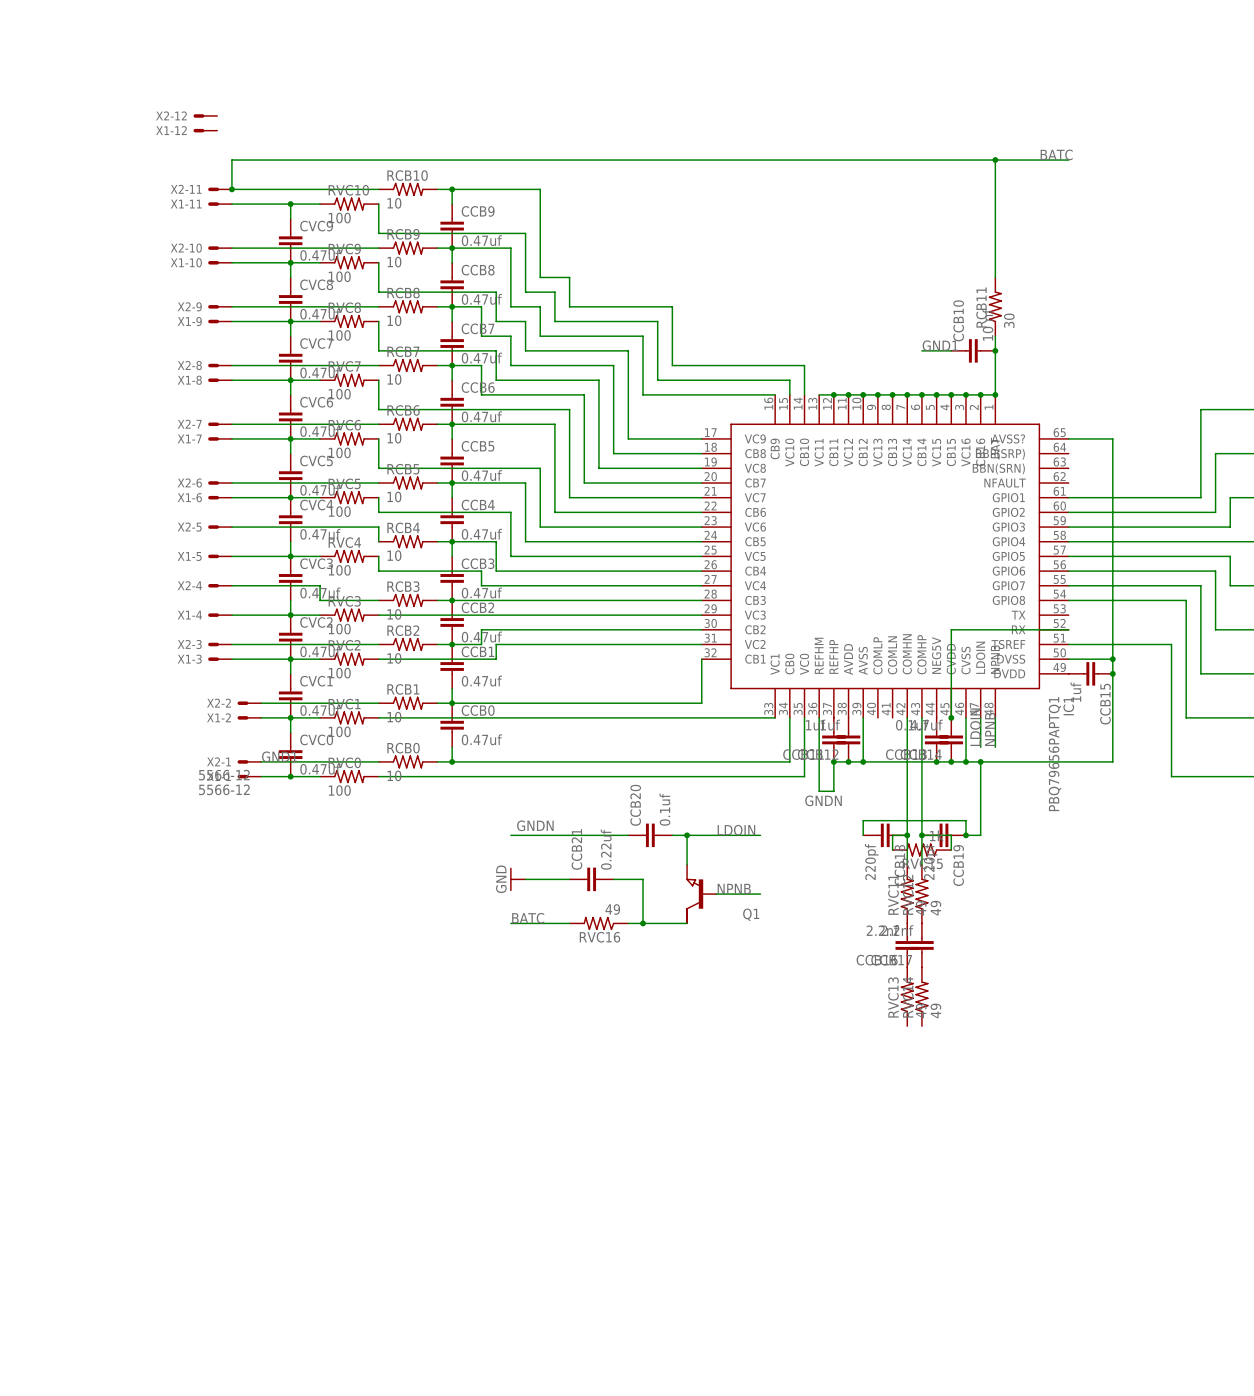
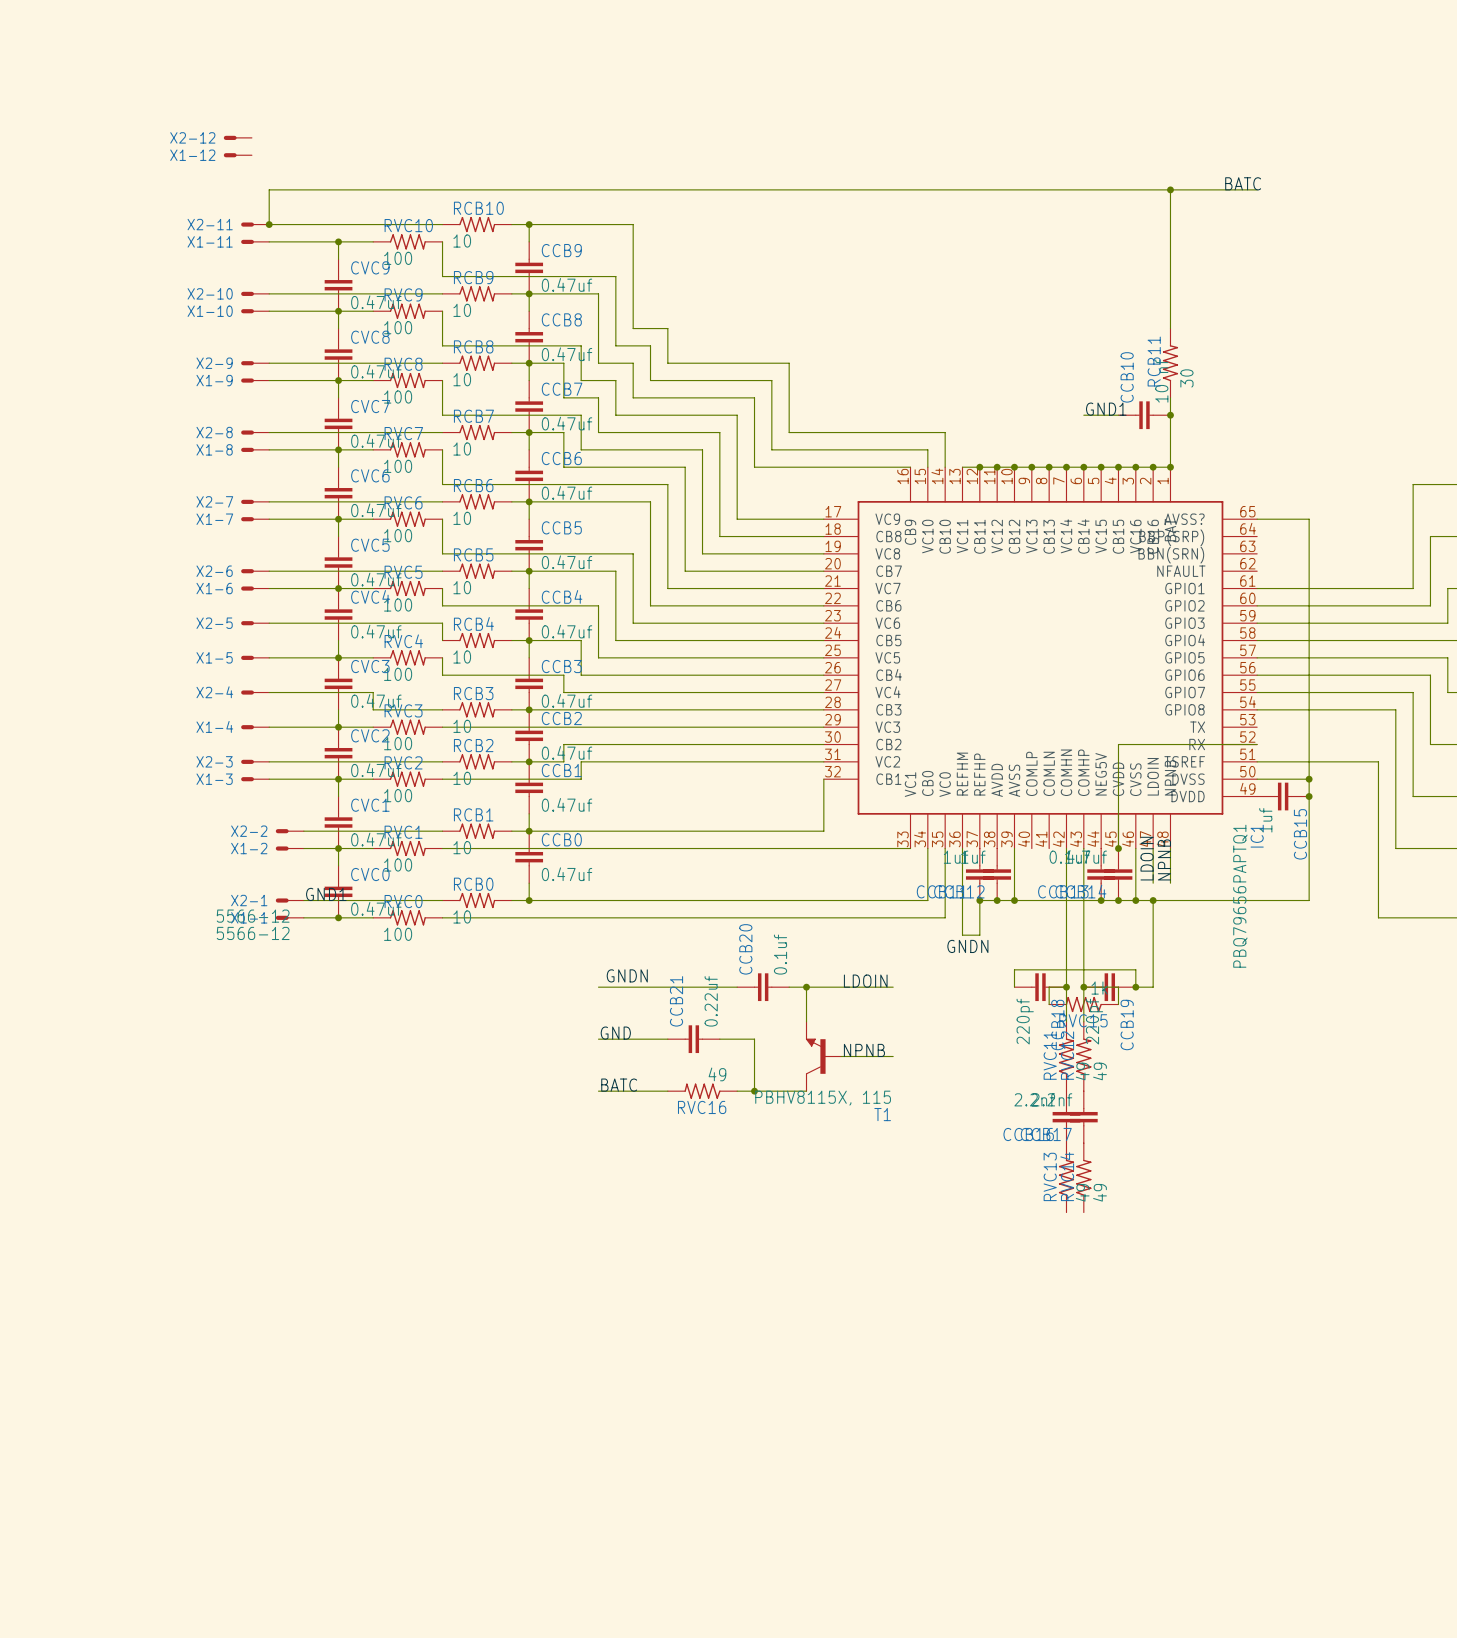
label: none -> GND (615, 1033)
power symbol: GND (517, 879) -> none
Q1: (701, 894) -> none
T1: none -> PBHV8115X, 115 (823, 1056)

